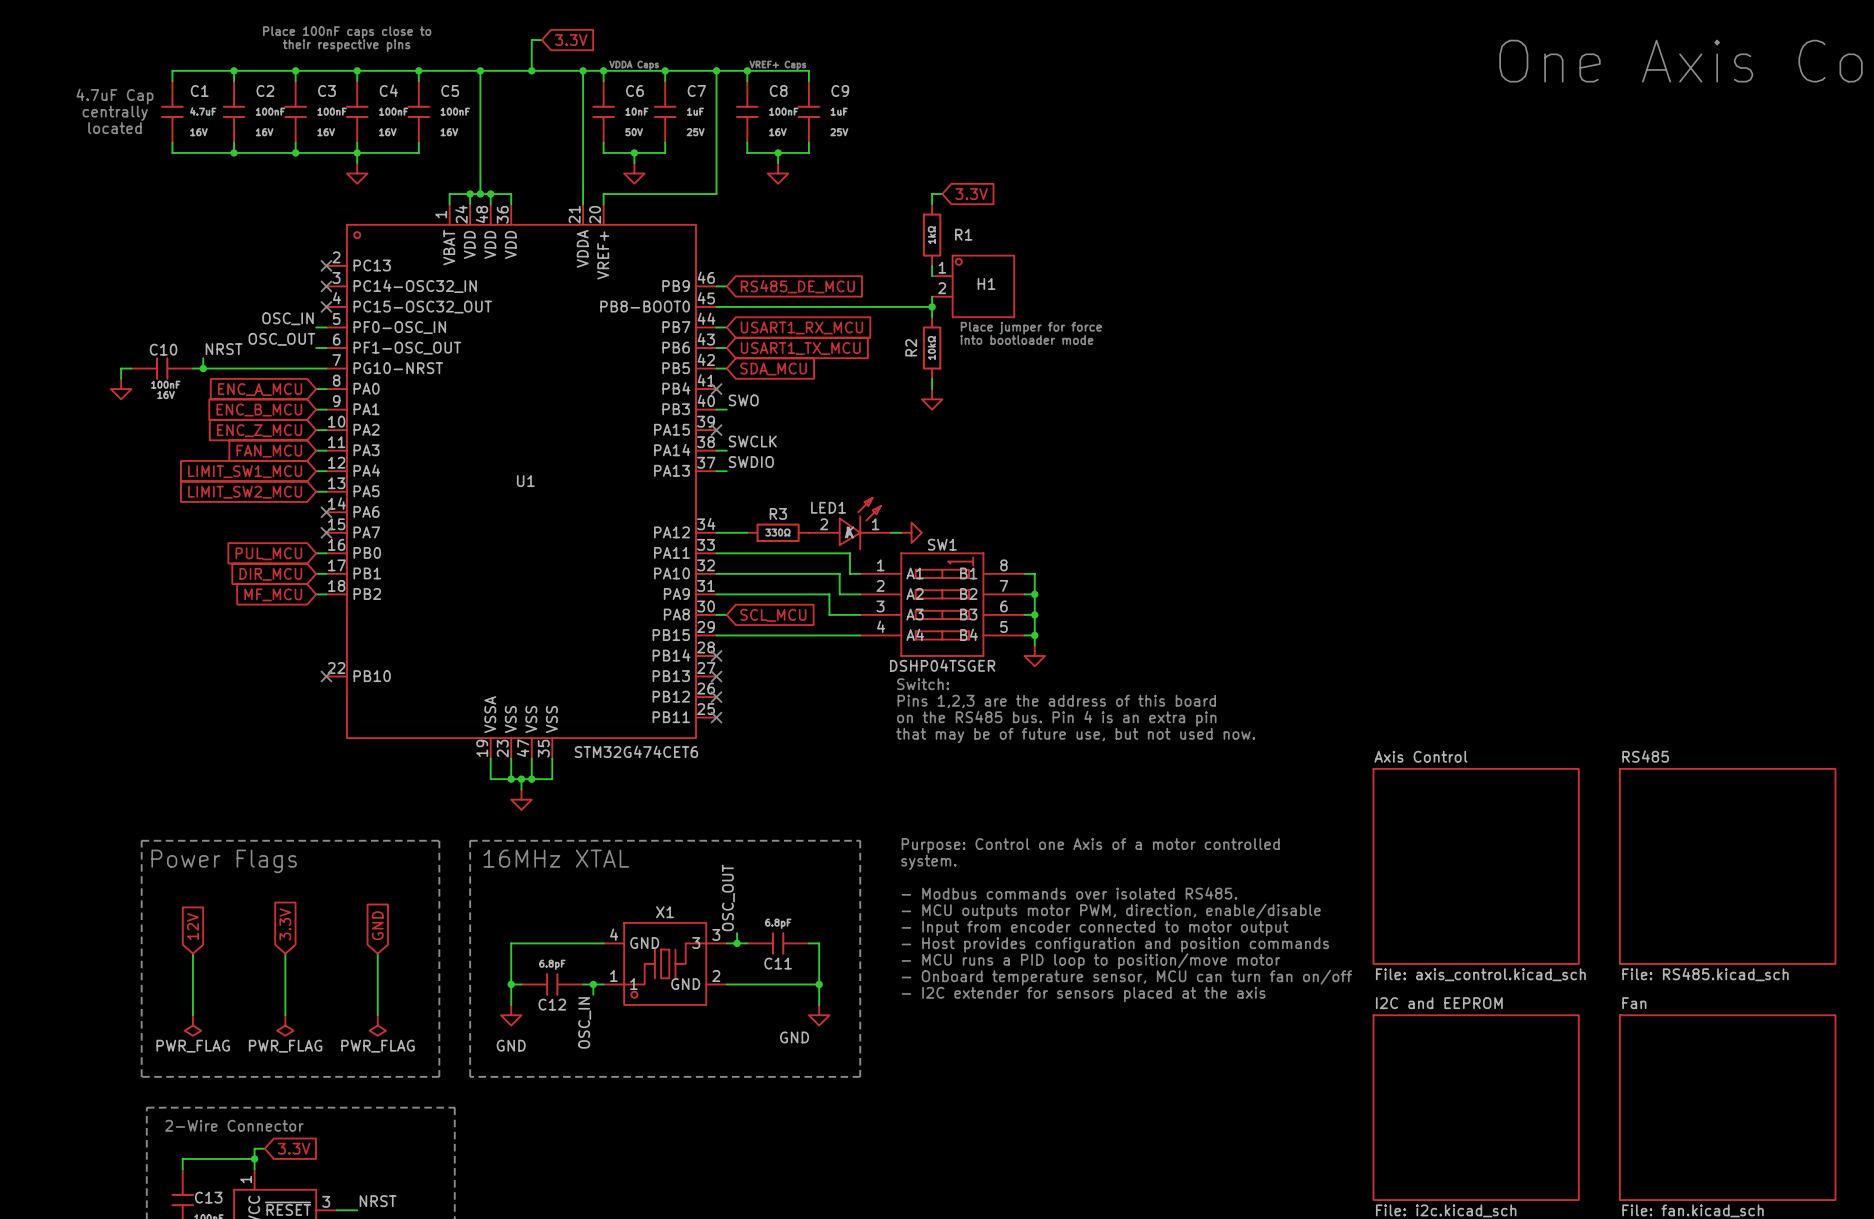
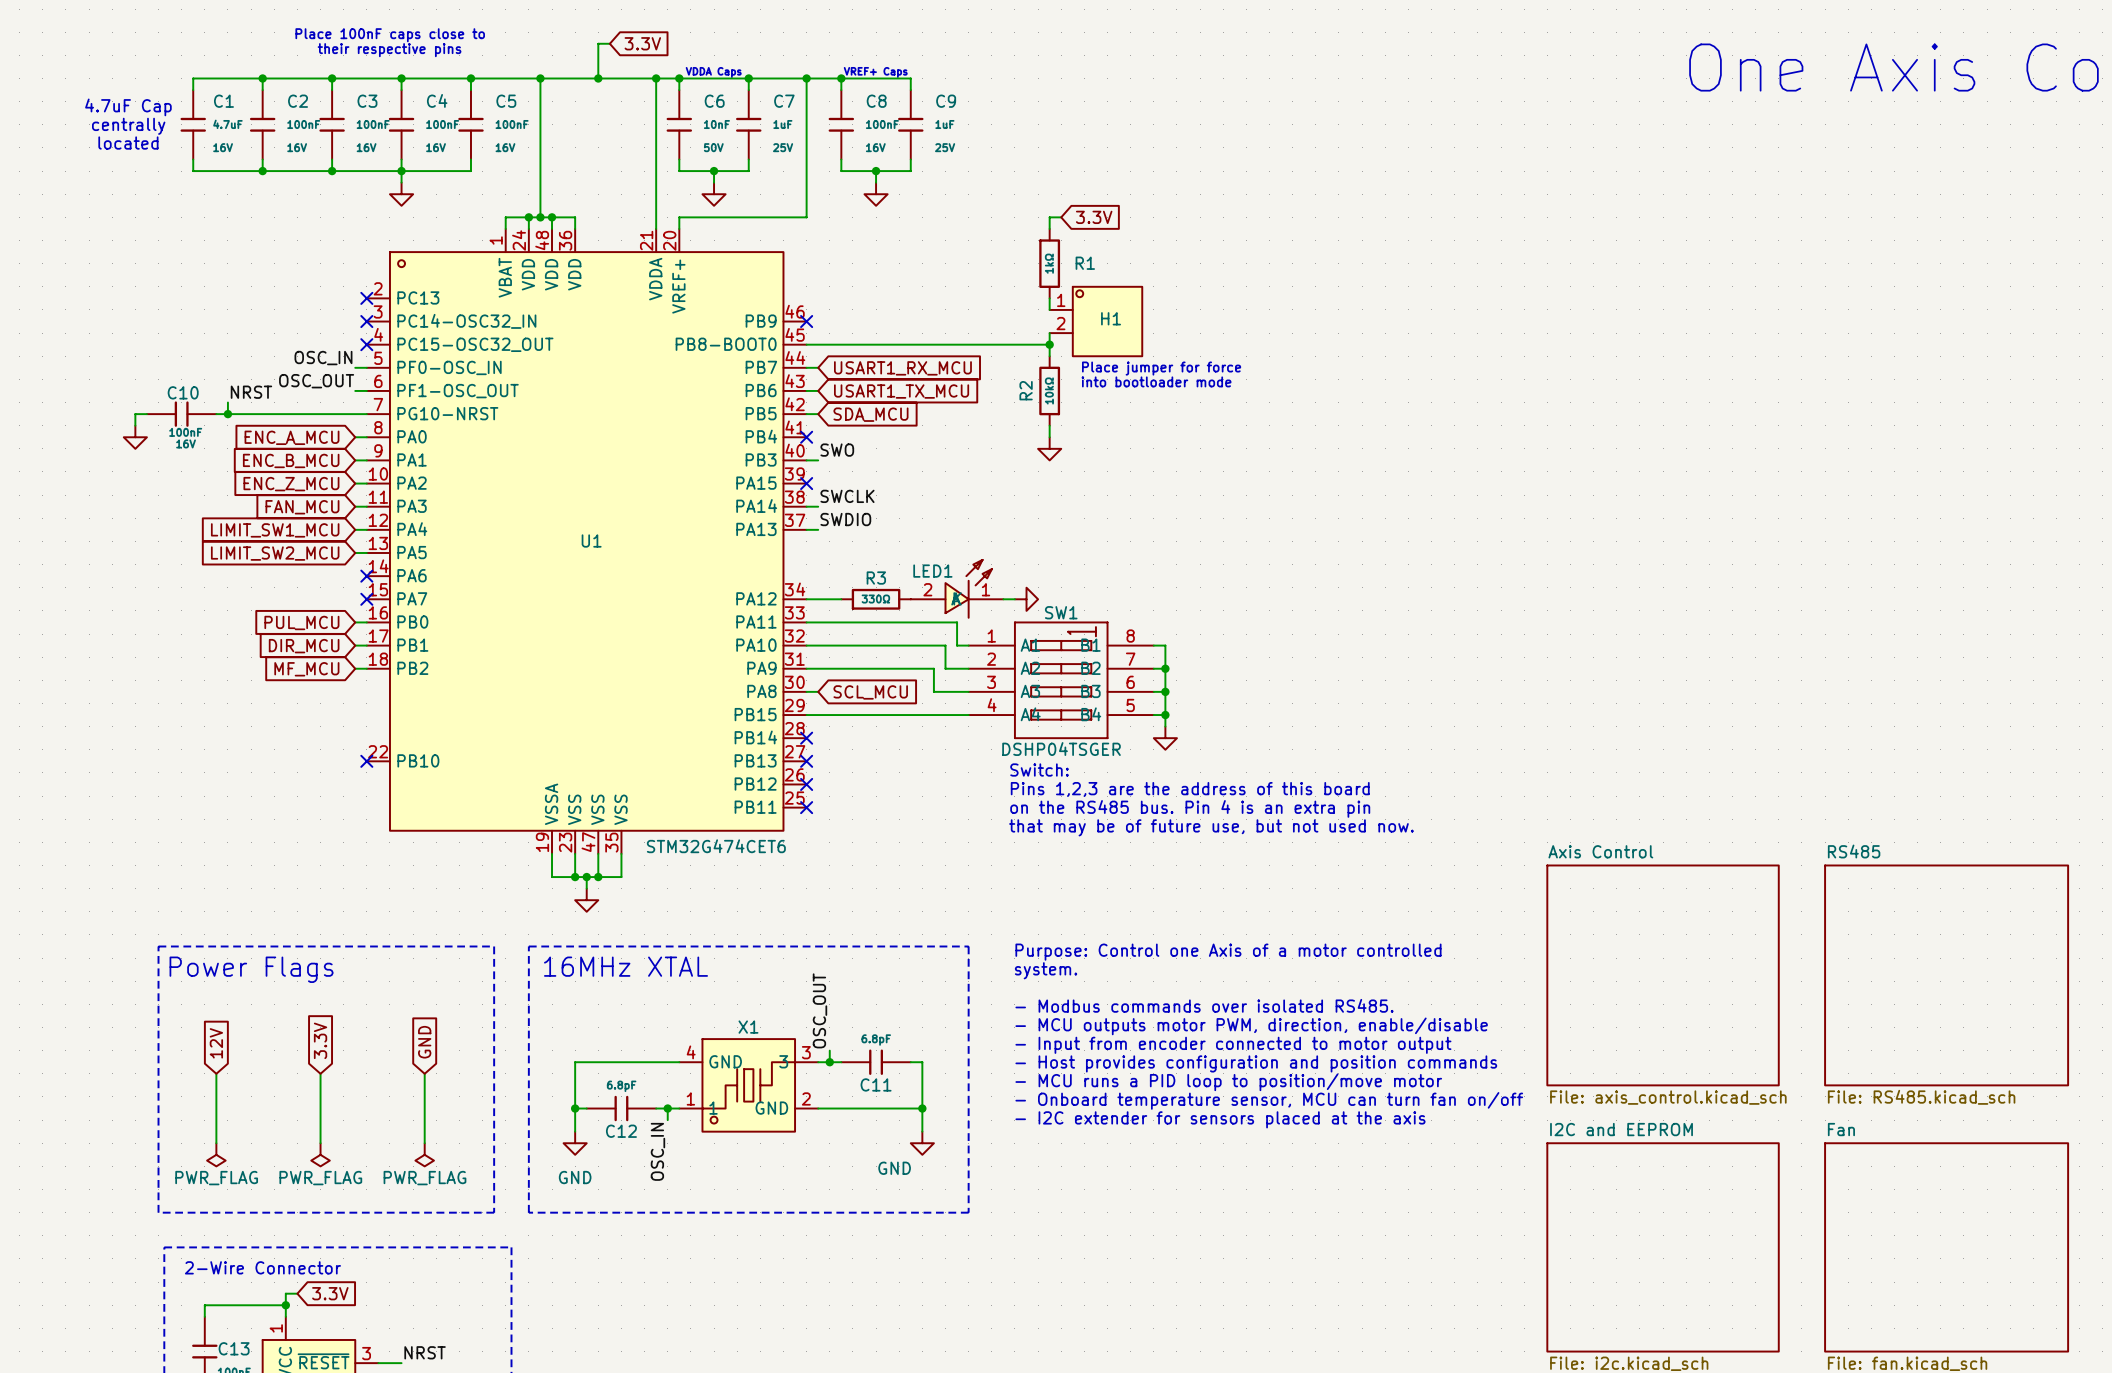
wire: (716, 286) (726, 286) -> none
no-connect mark: none -> (806, 321)
global label: RS485_DE_MCU (797, 286) -> none

